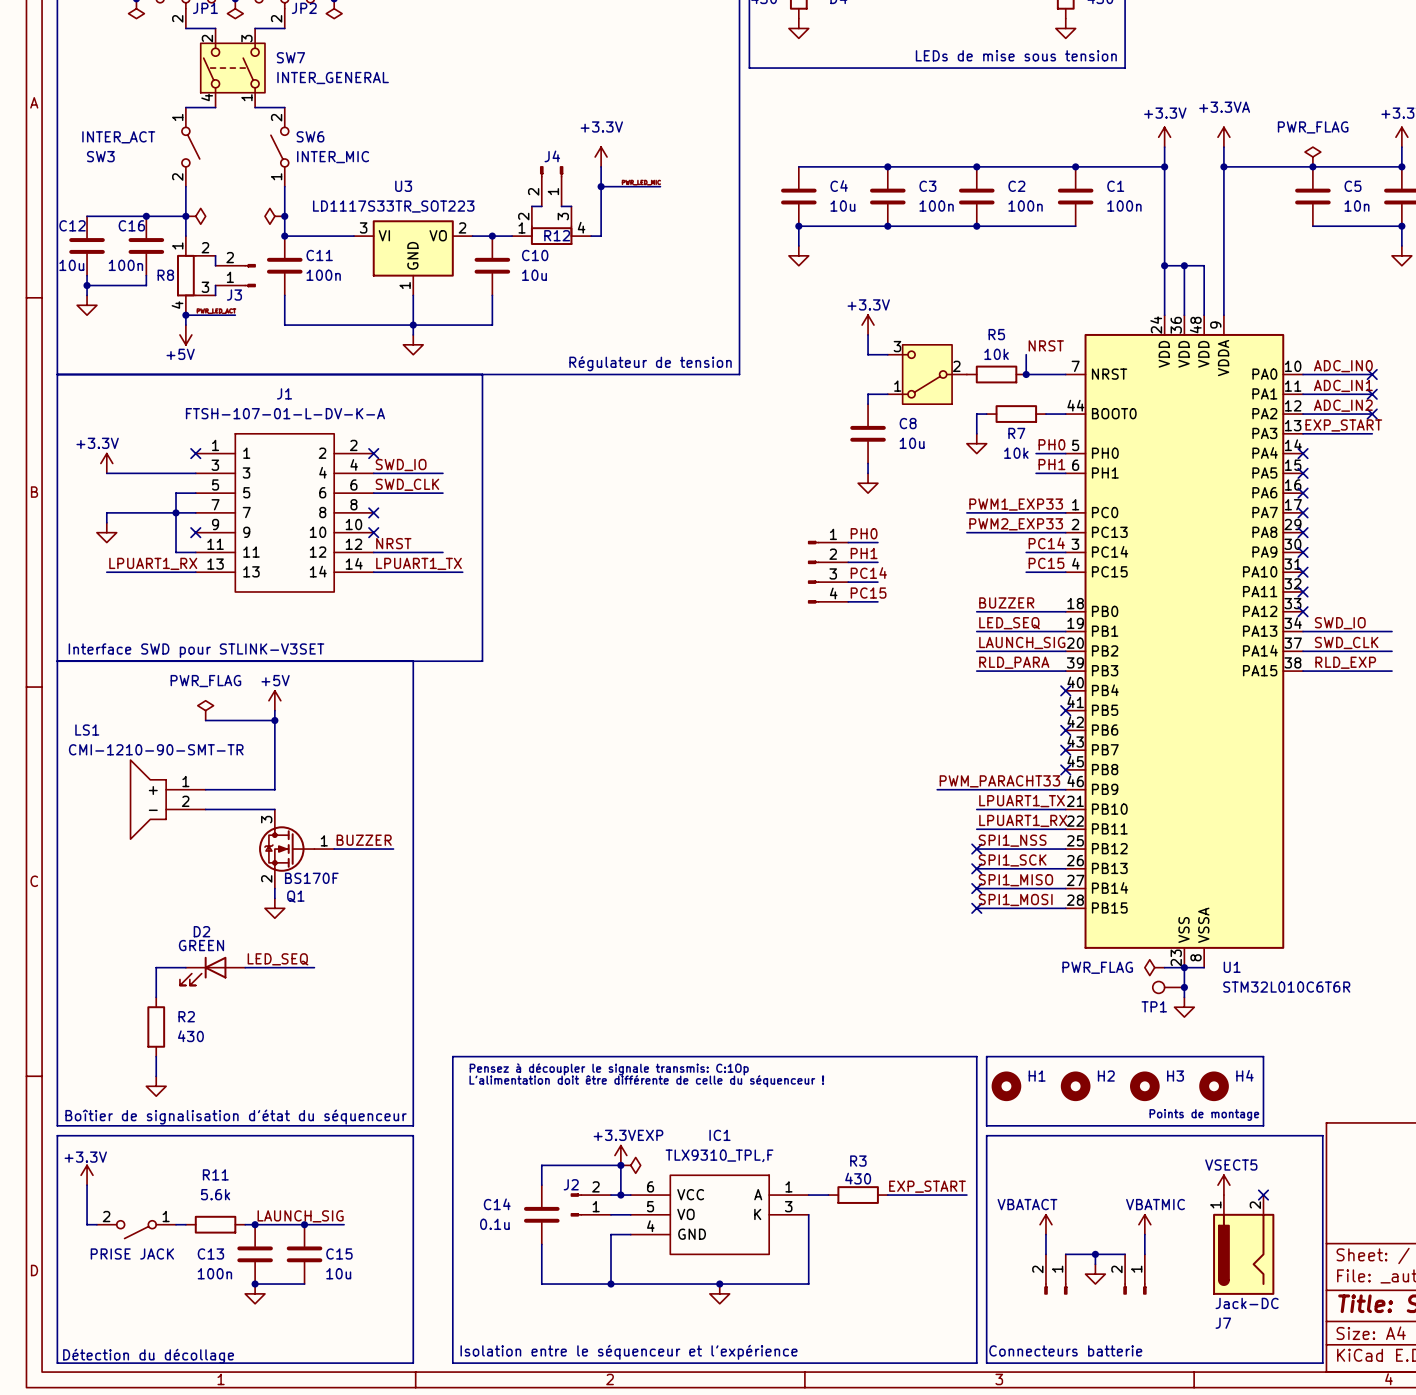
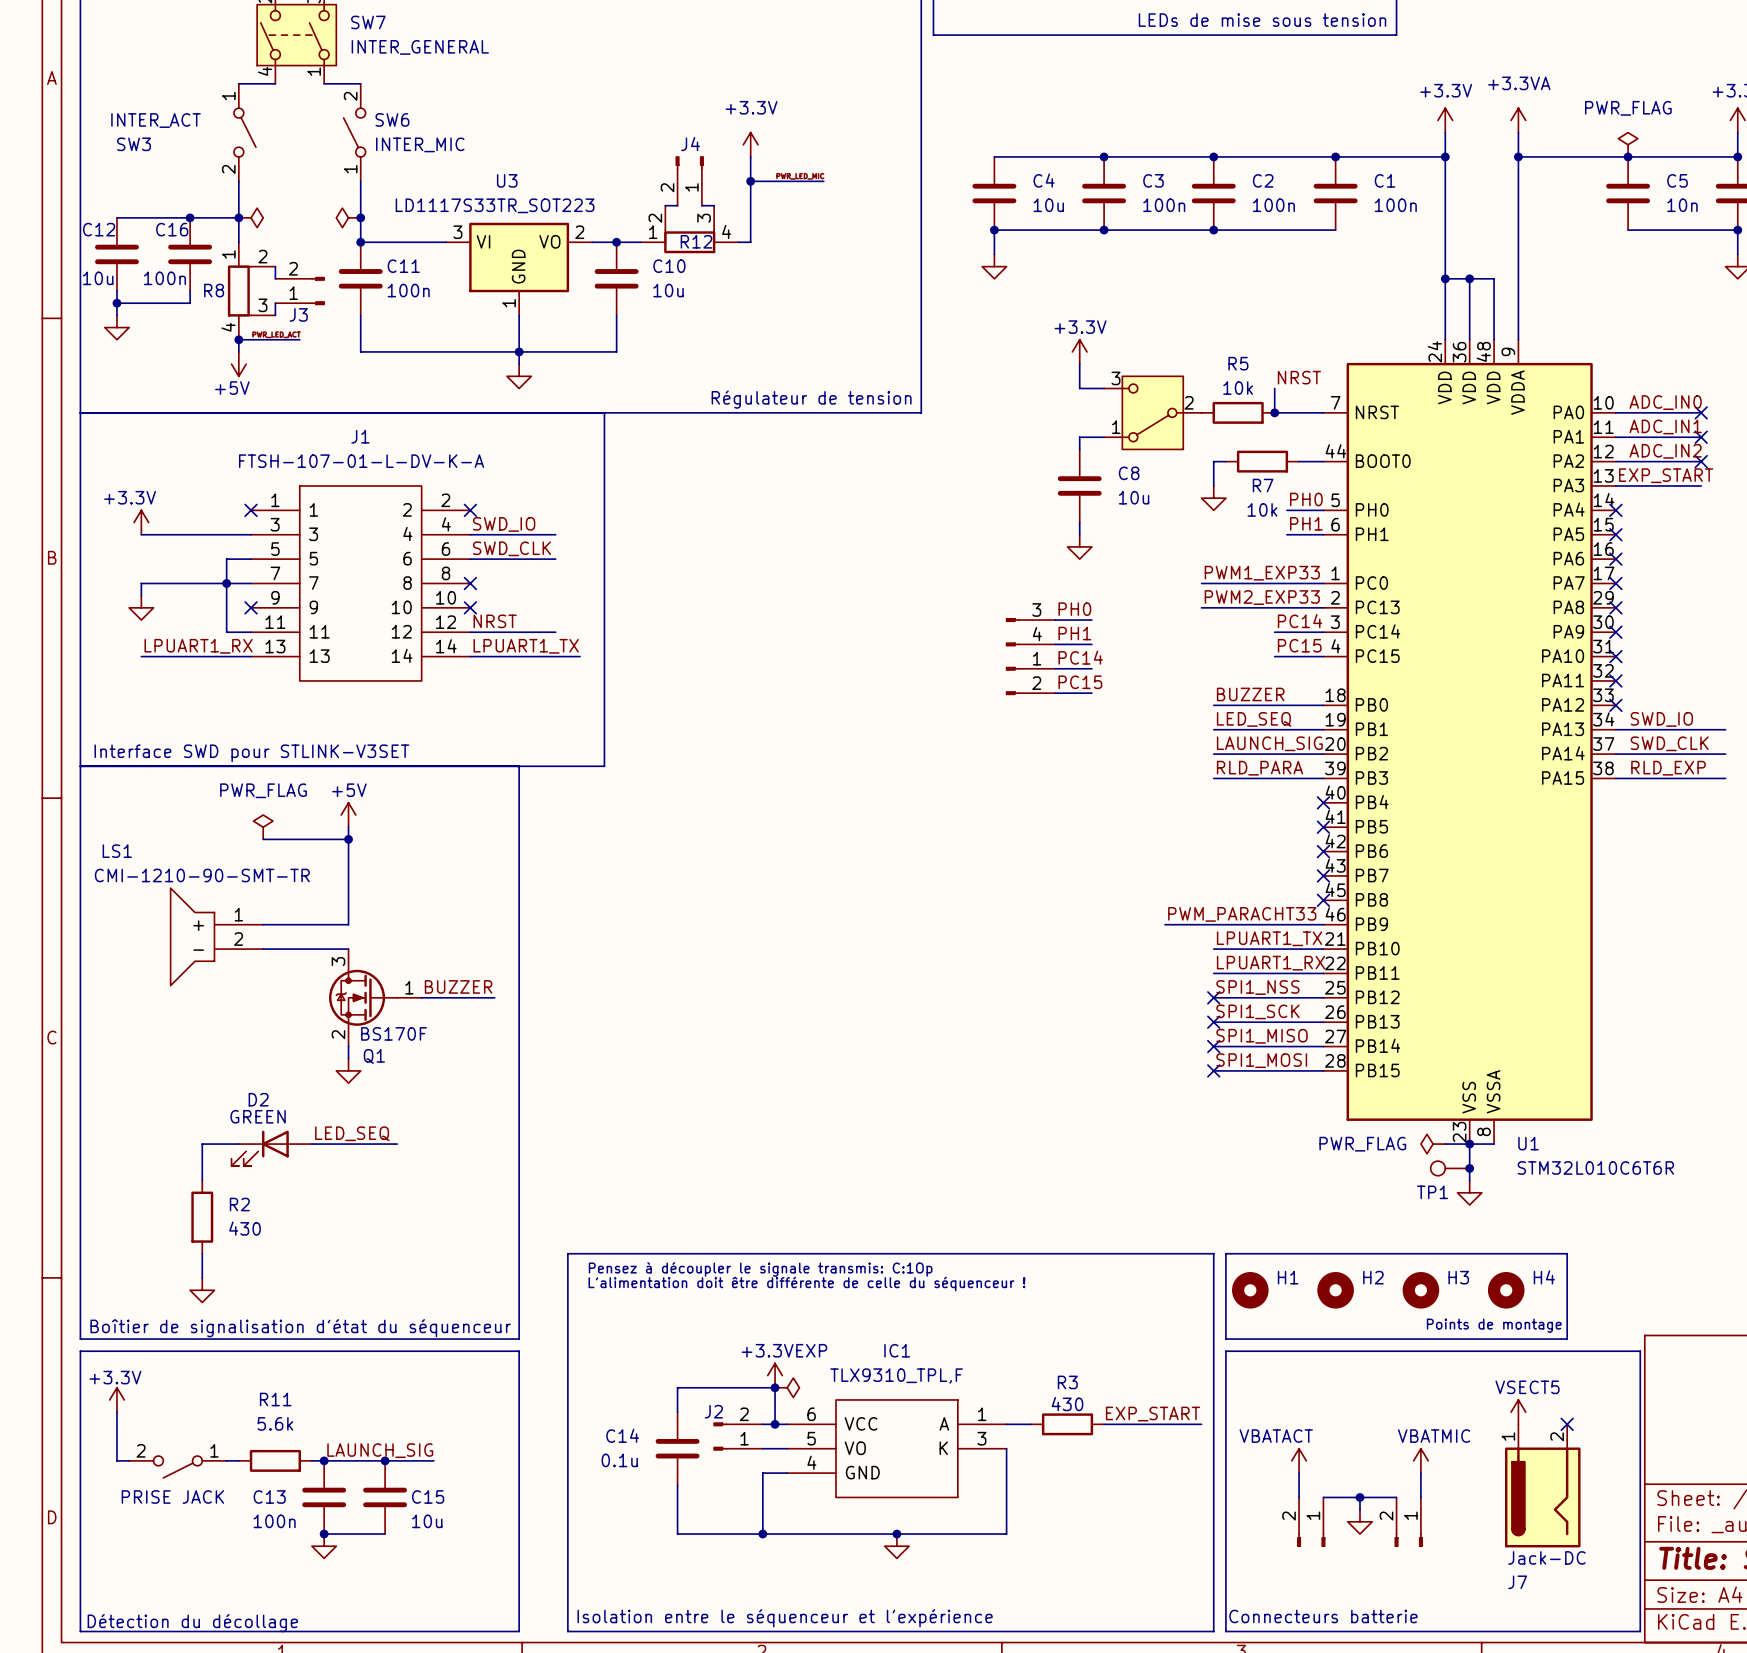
part pin number: 1 (833, 534) -> 3 (1036, 609)
part pin number: 2 (833, 554) -> 4 (1037, 634)
part pin number: 3 (833, 573) -> 1 (1037, 658)
part pin number: 4 (833, 593) -> 2 (1036, 683)

